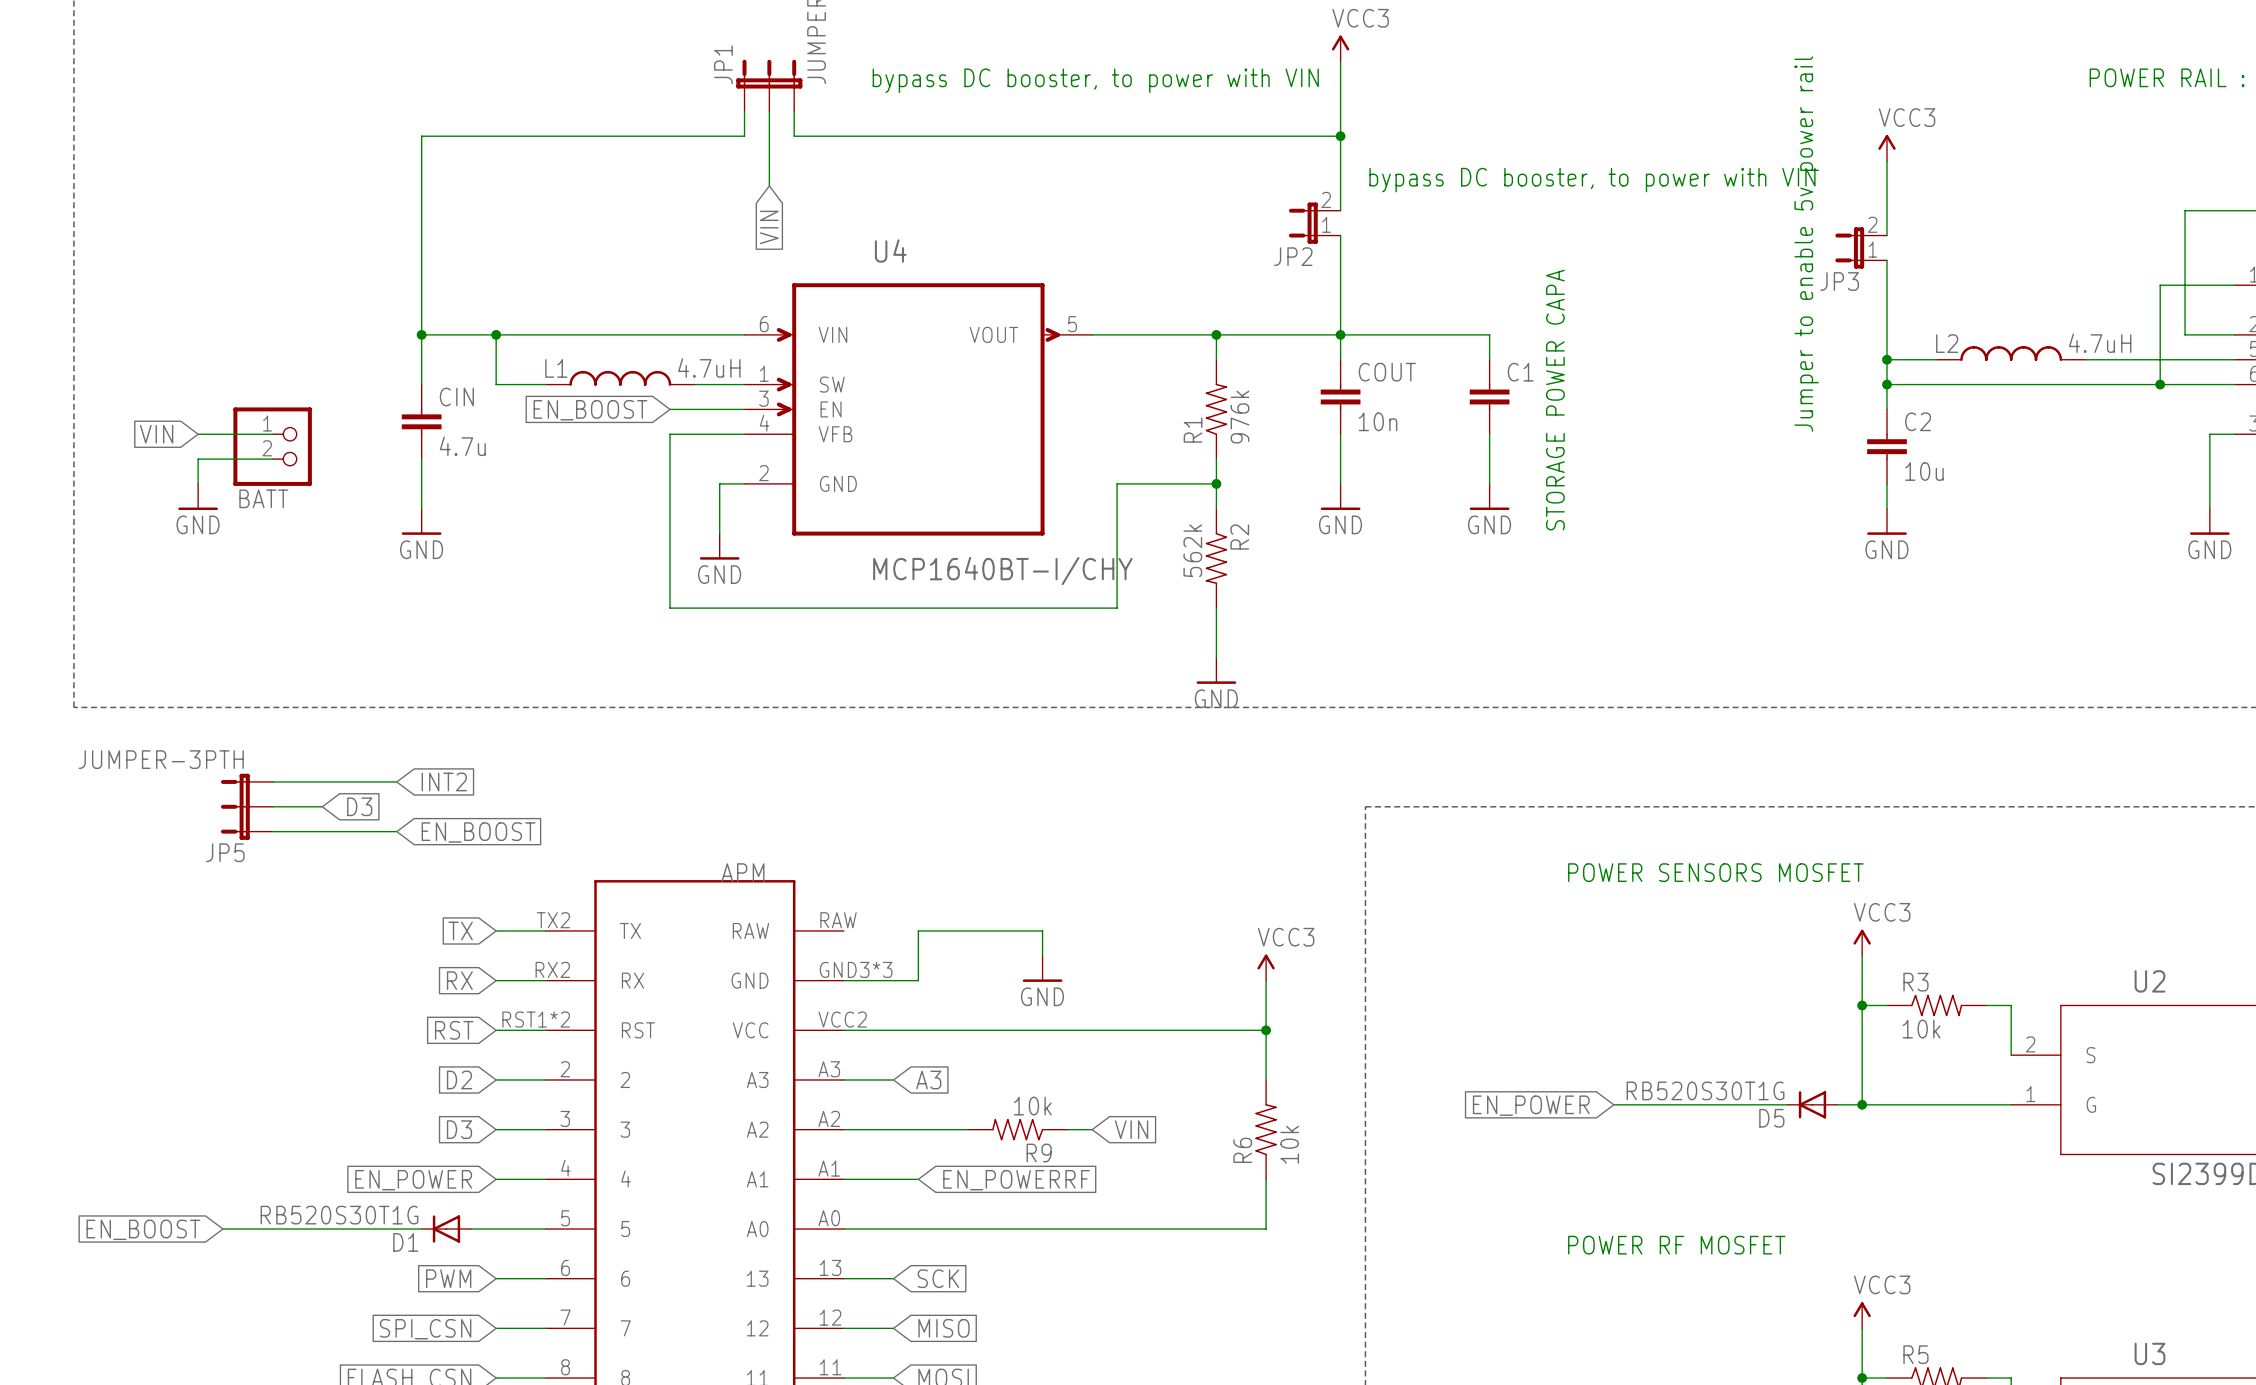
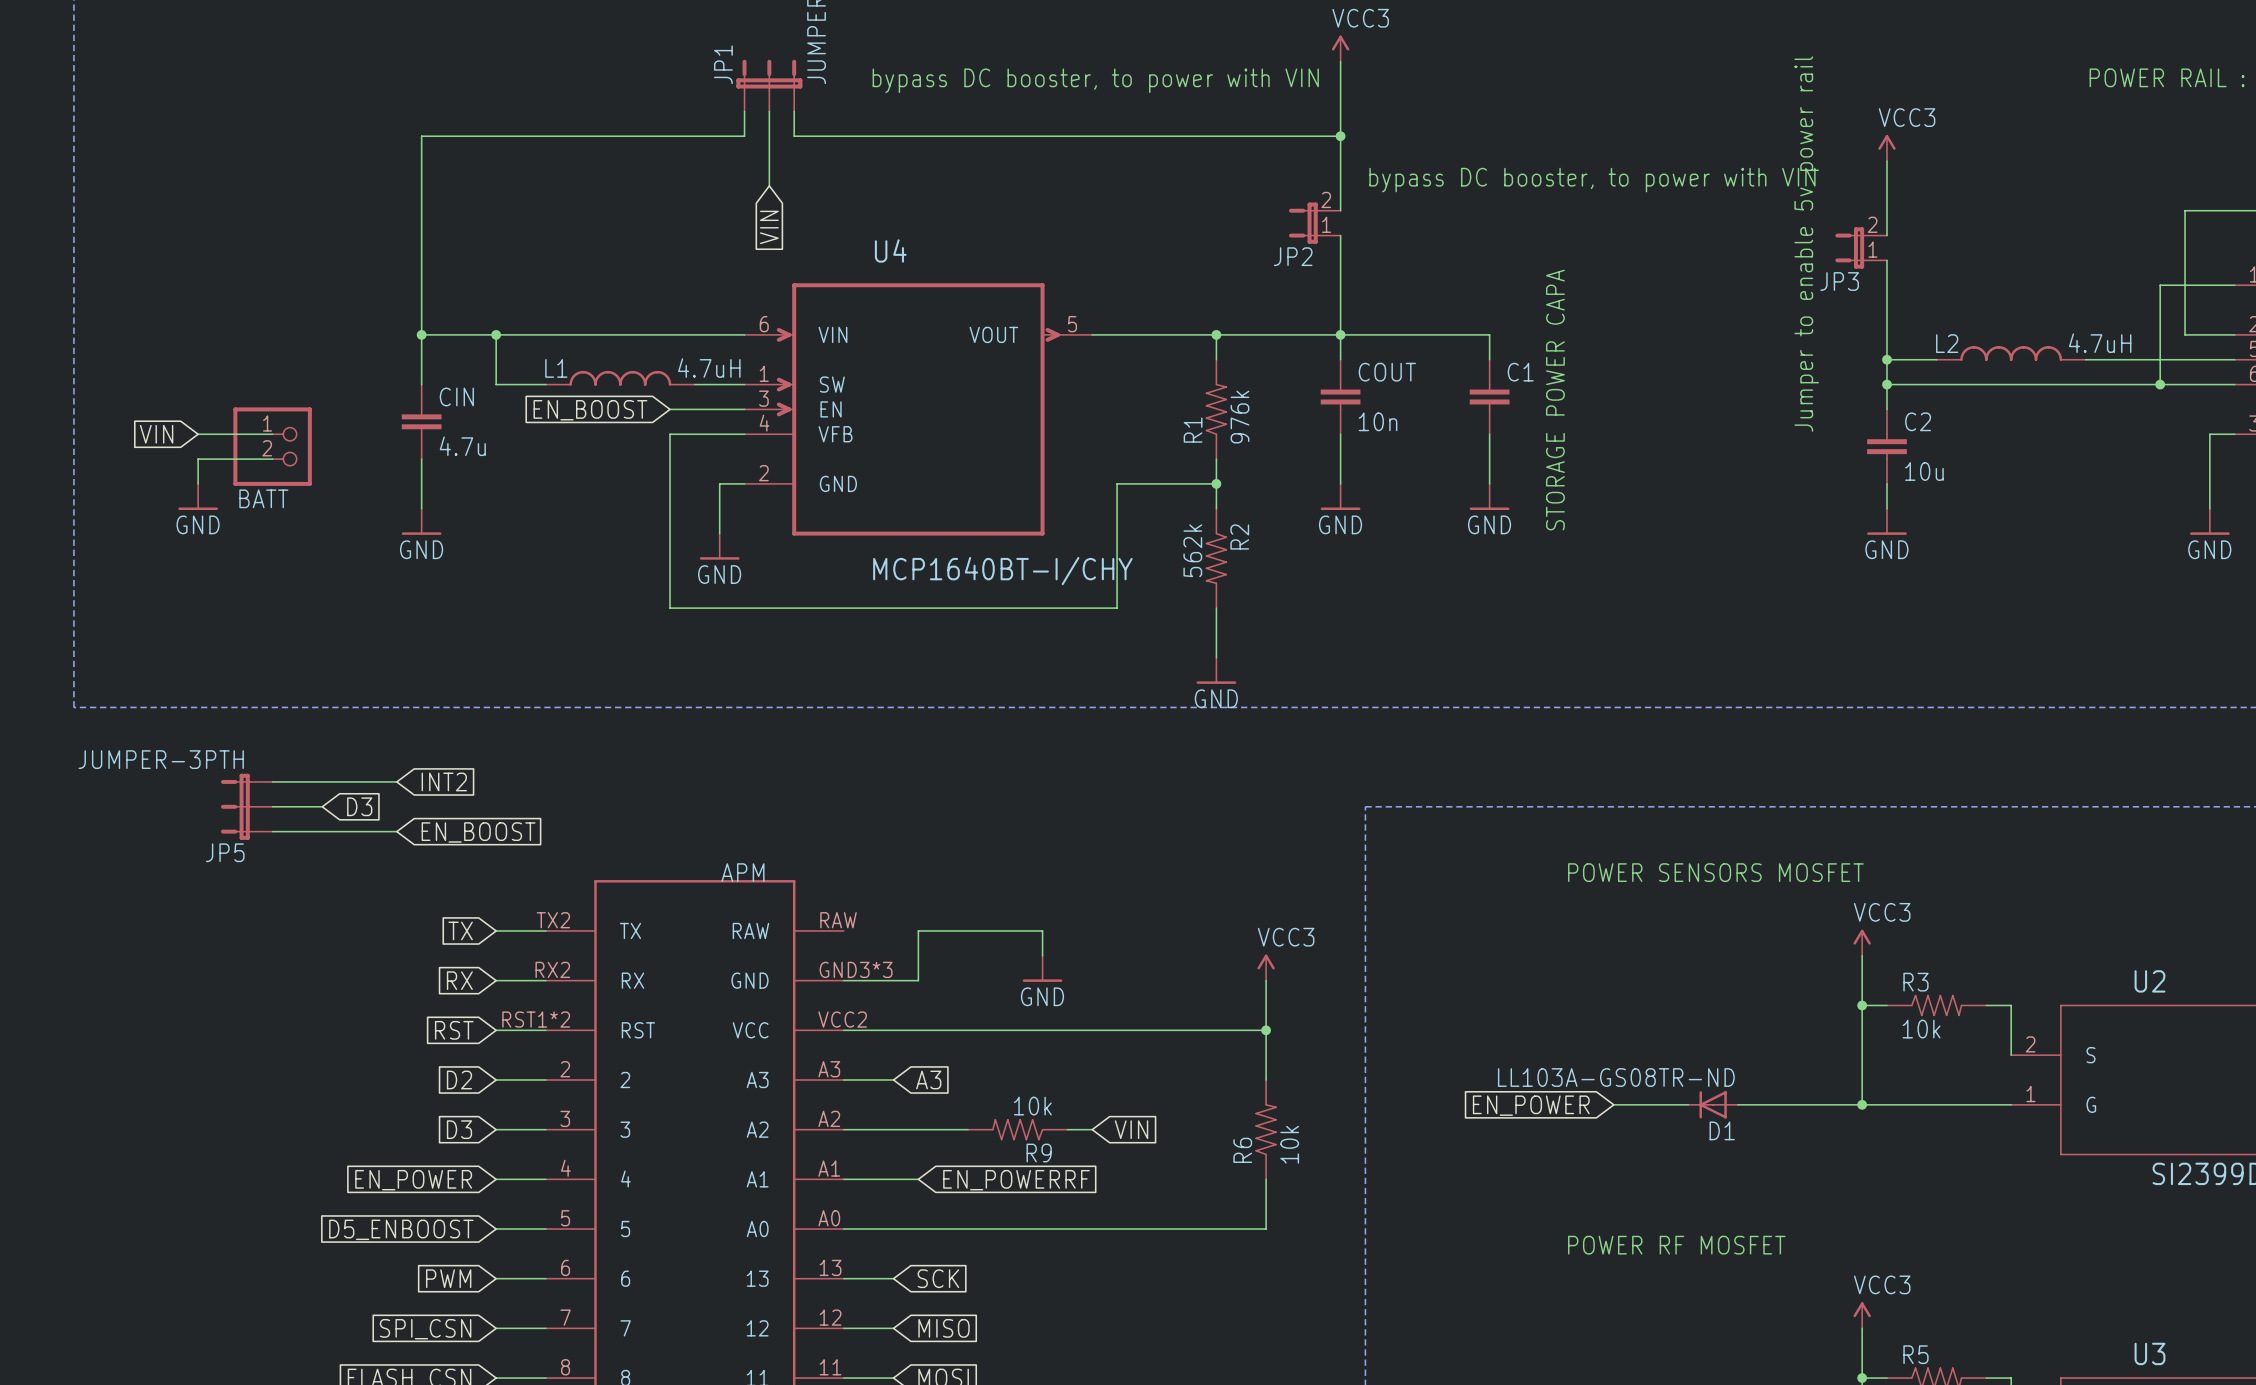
D5: RB520S30T1G (1812, 1104) -> none
D1 value: RB520S30T1G (339, 1215) -> LL103A-GS08TR-ND (1616, 1077)
global label: EN_BOOST (143, 1229) -> none
wire: (222, 1229) (421, 1229) -> none
global label: none -> D5_ENBOOST (401, 1229)
D1 position: (446, 1229) -> (1713, 1104)
wire: (471, 1229) (496, 1229) -> none
D1 name position: D1 (405, 1242) -> D1 (1722, 1130)

